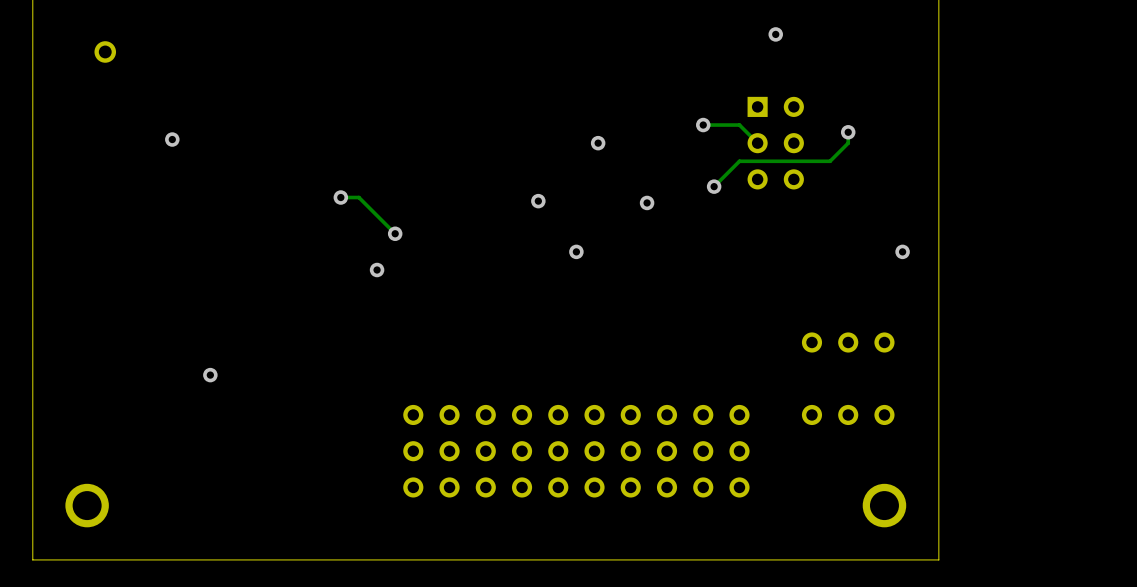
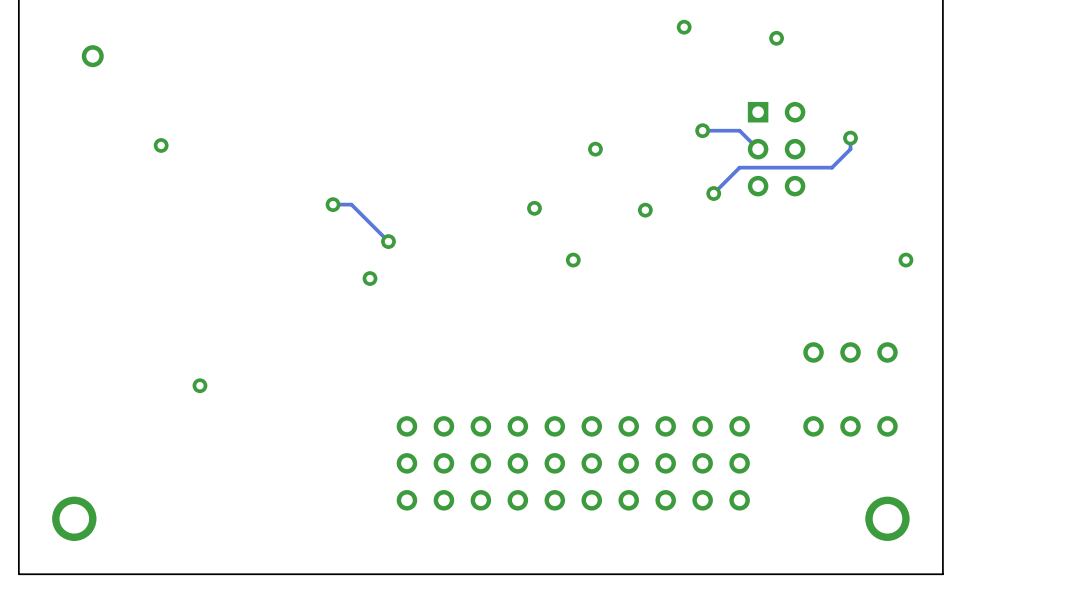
via: none -> (684, 27)

